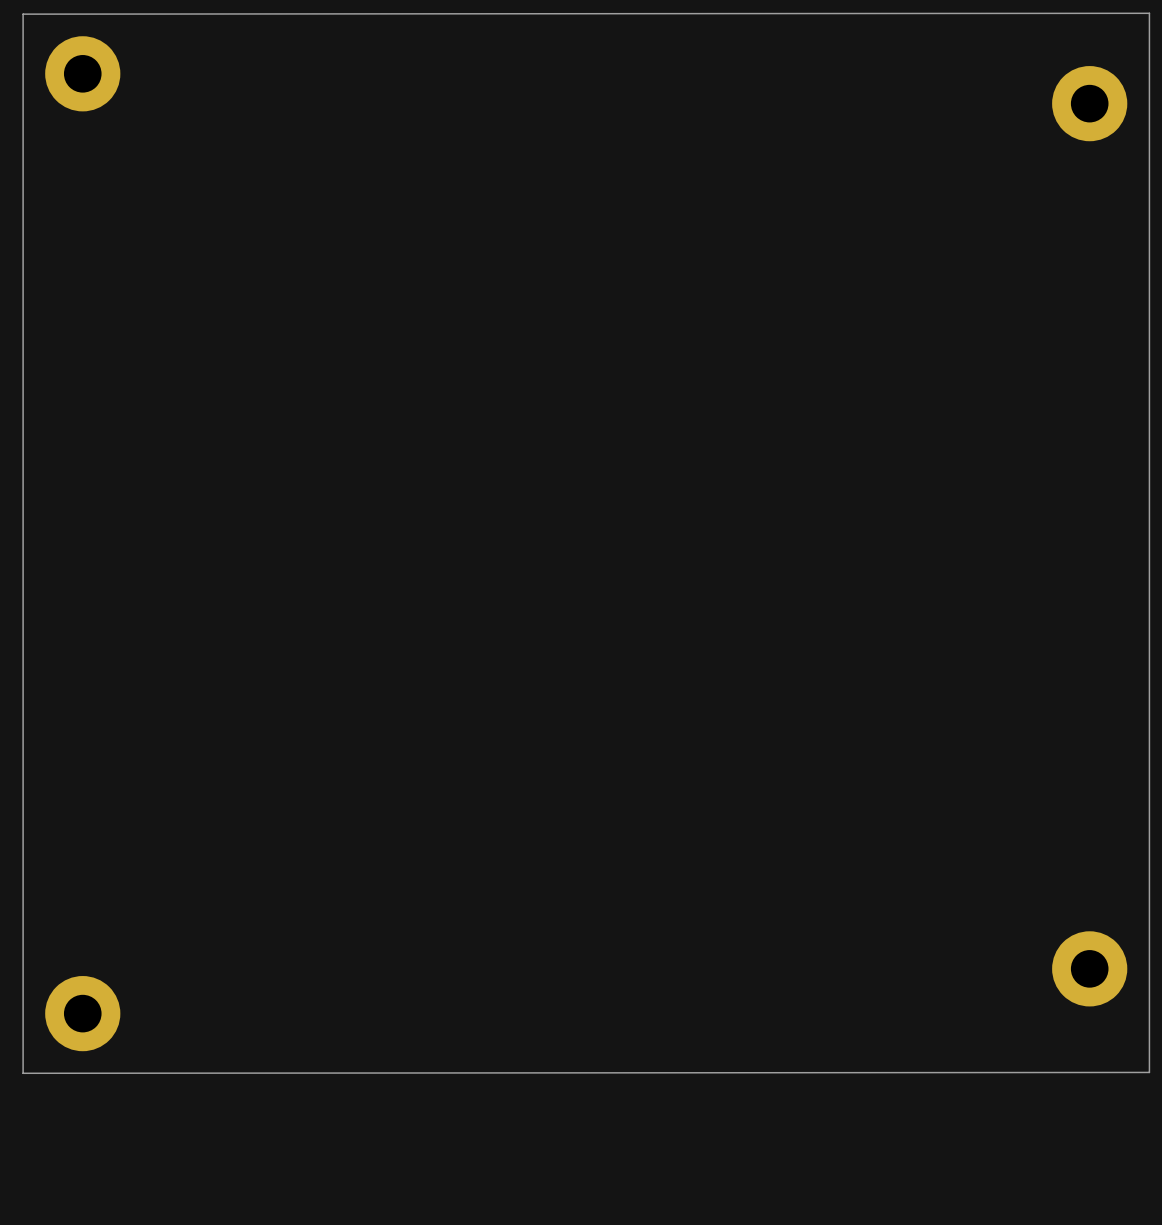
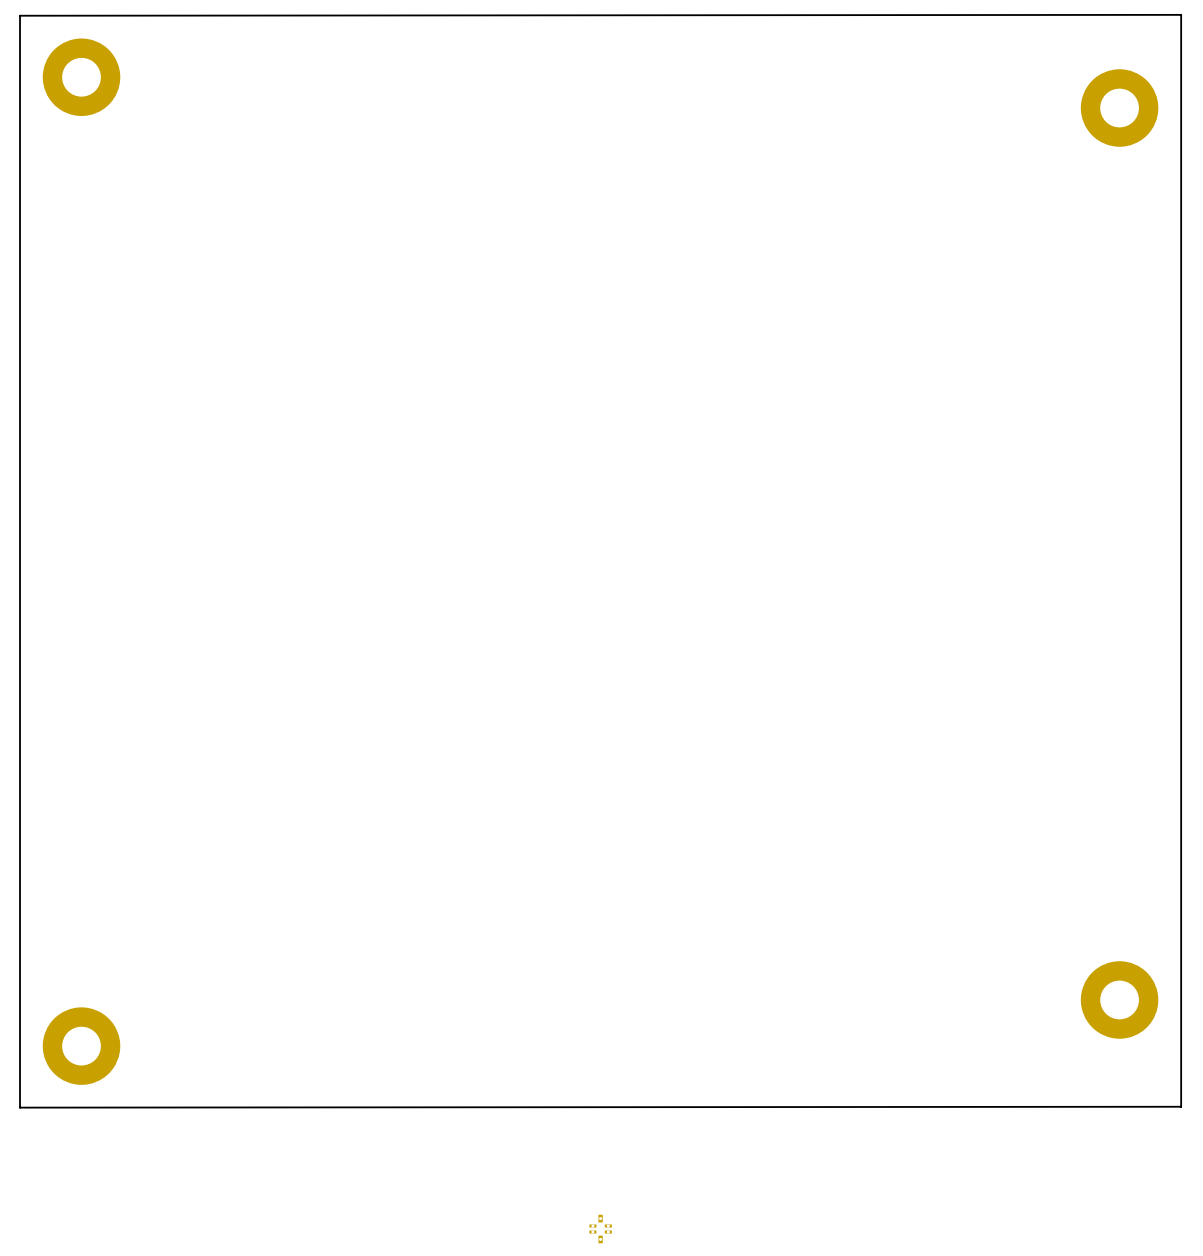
part: none -> (600, 1229)

